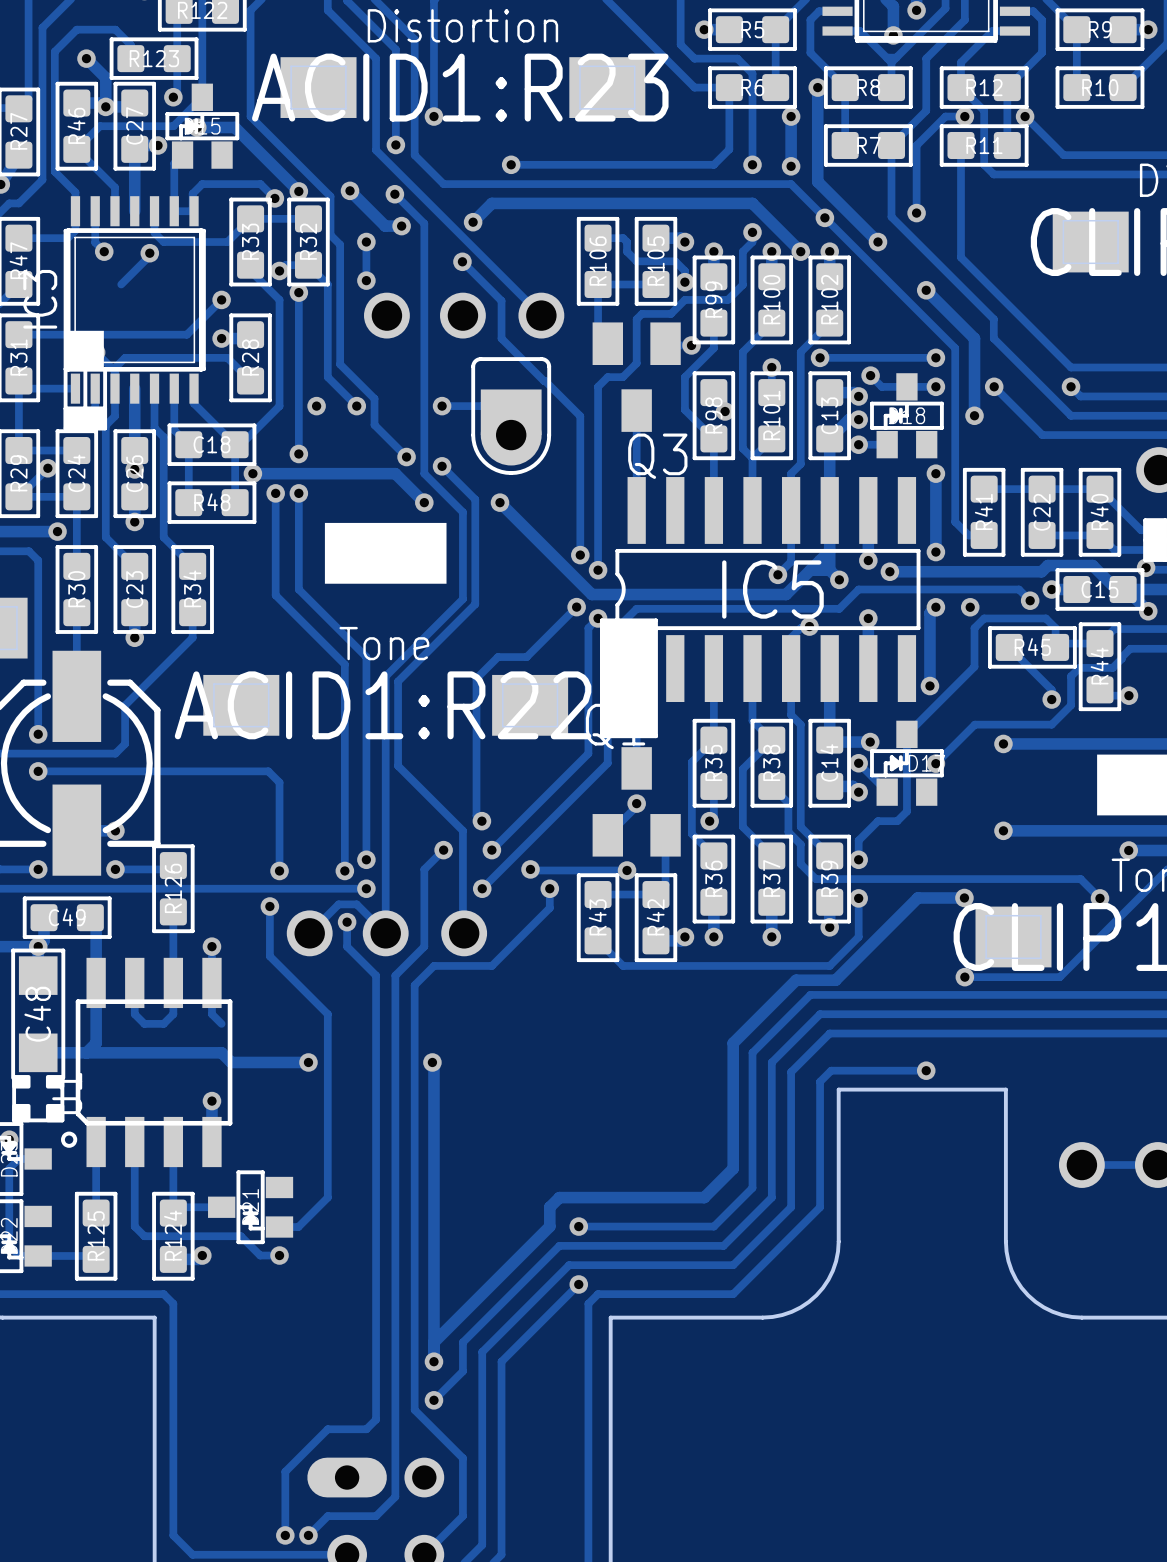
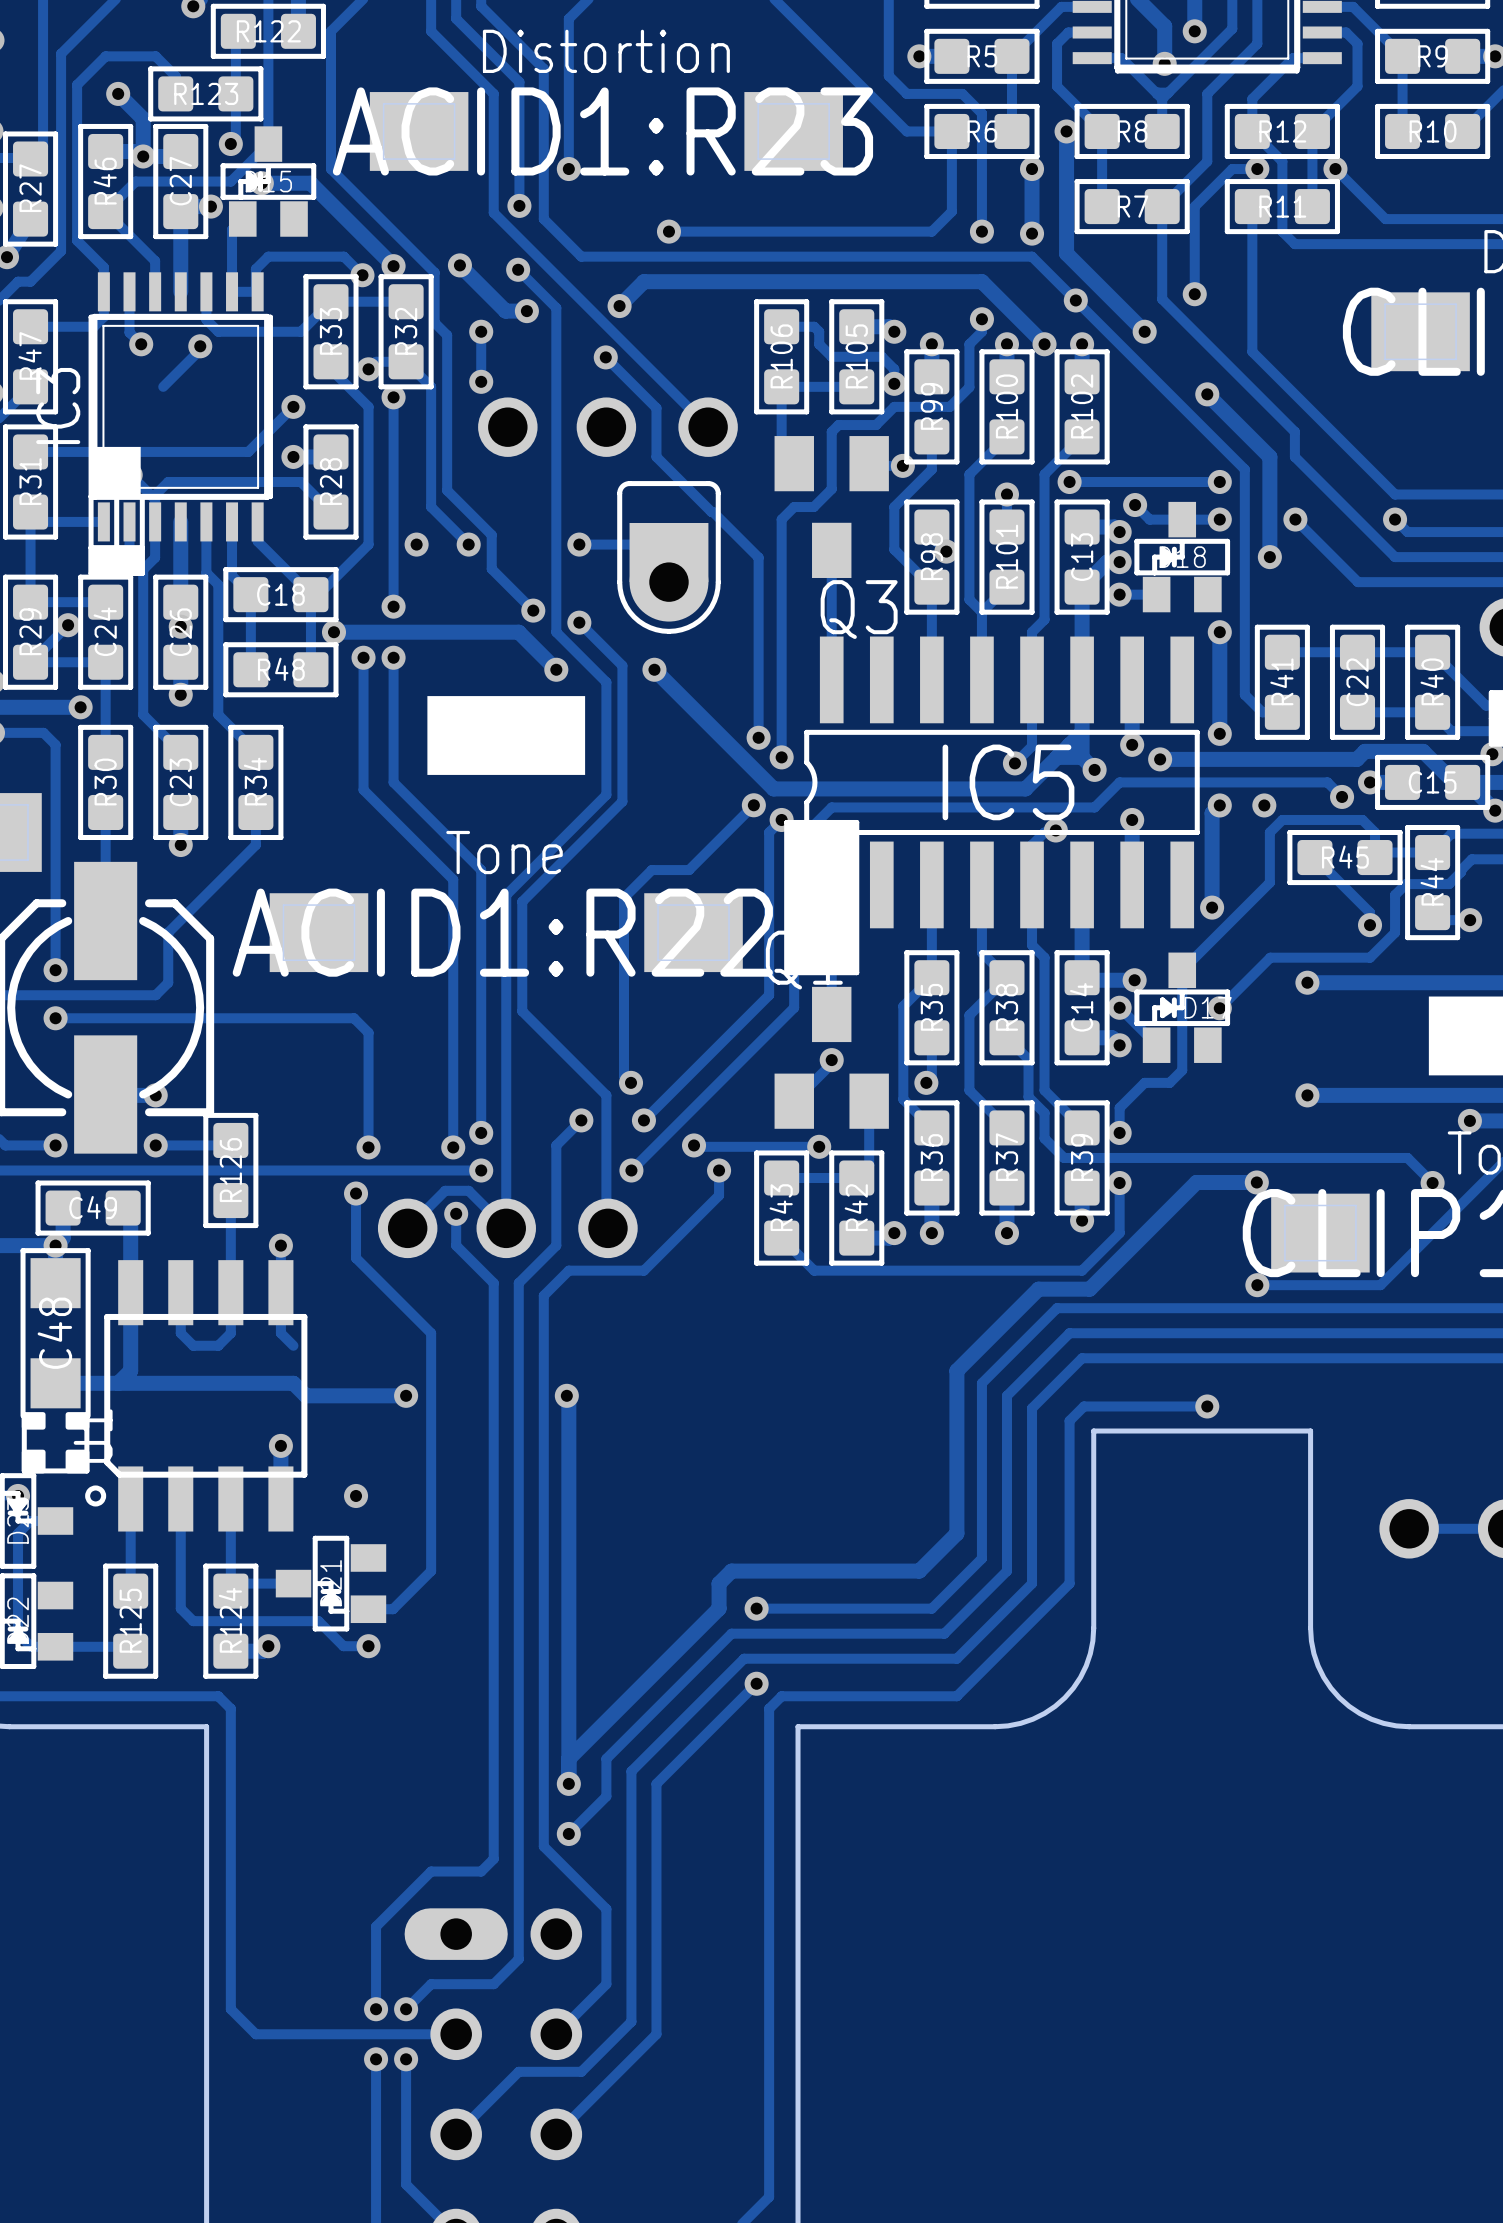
via: none -> (356, 1495)

